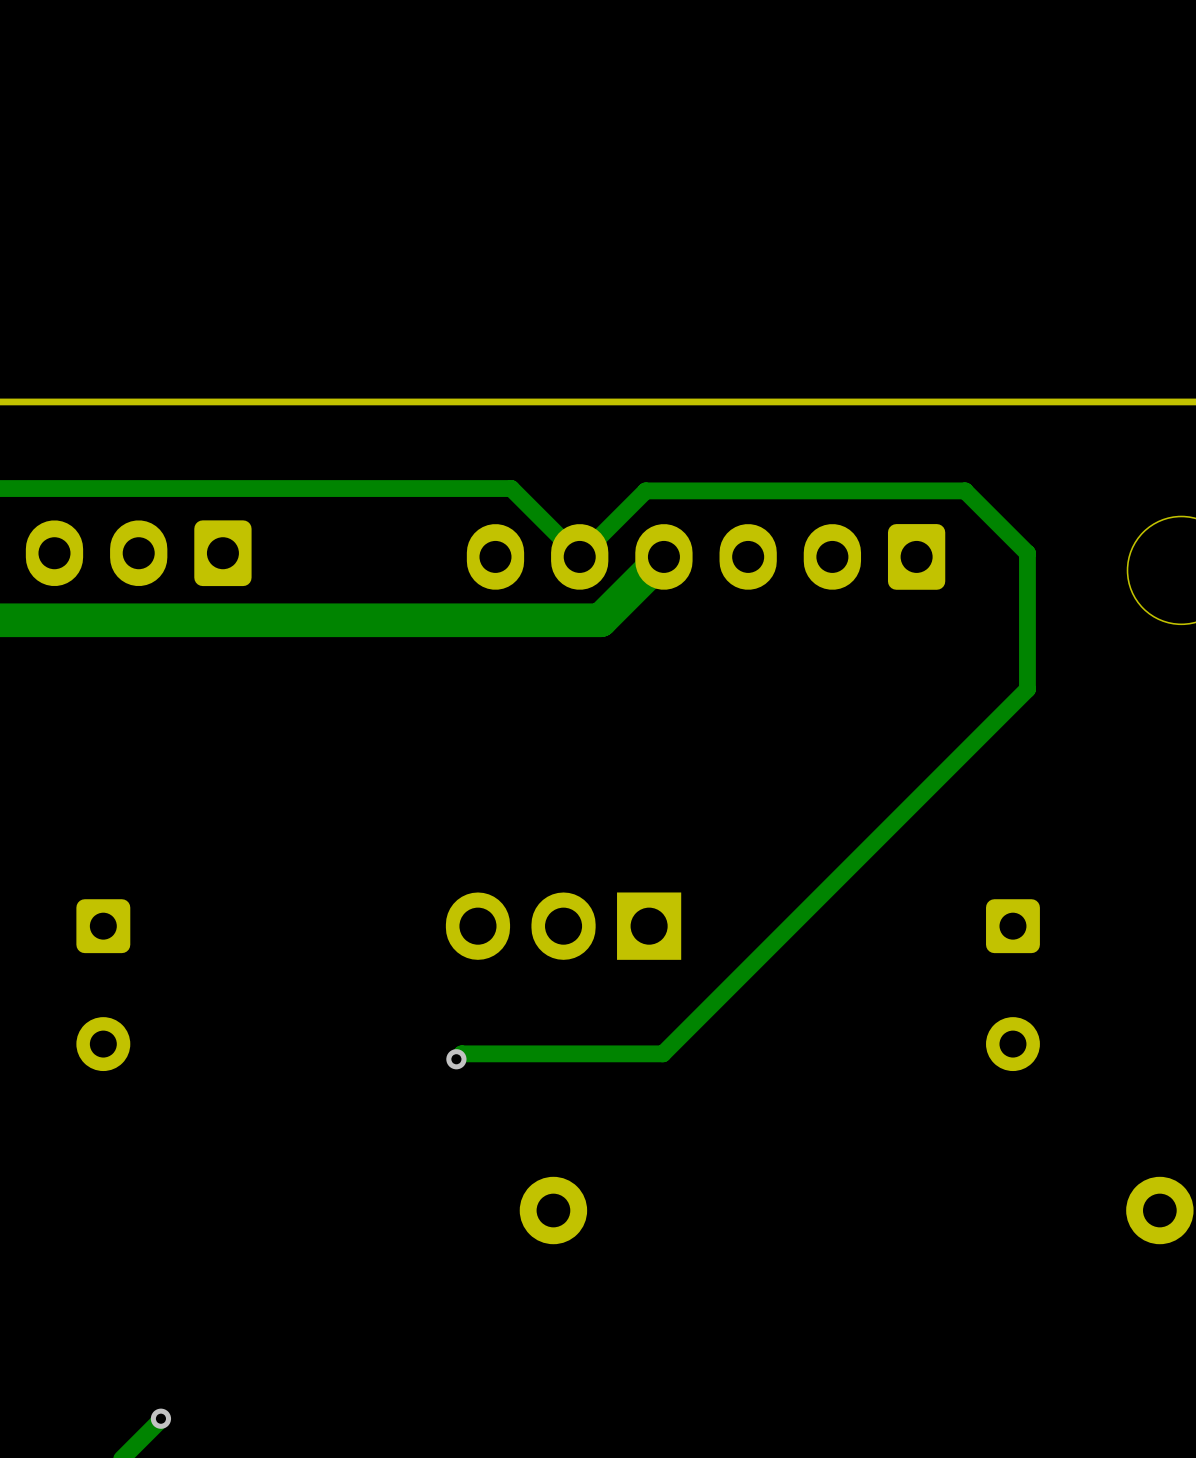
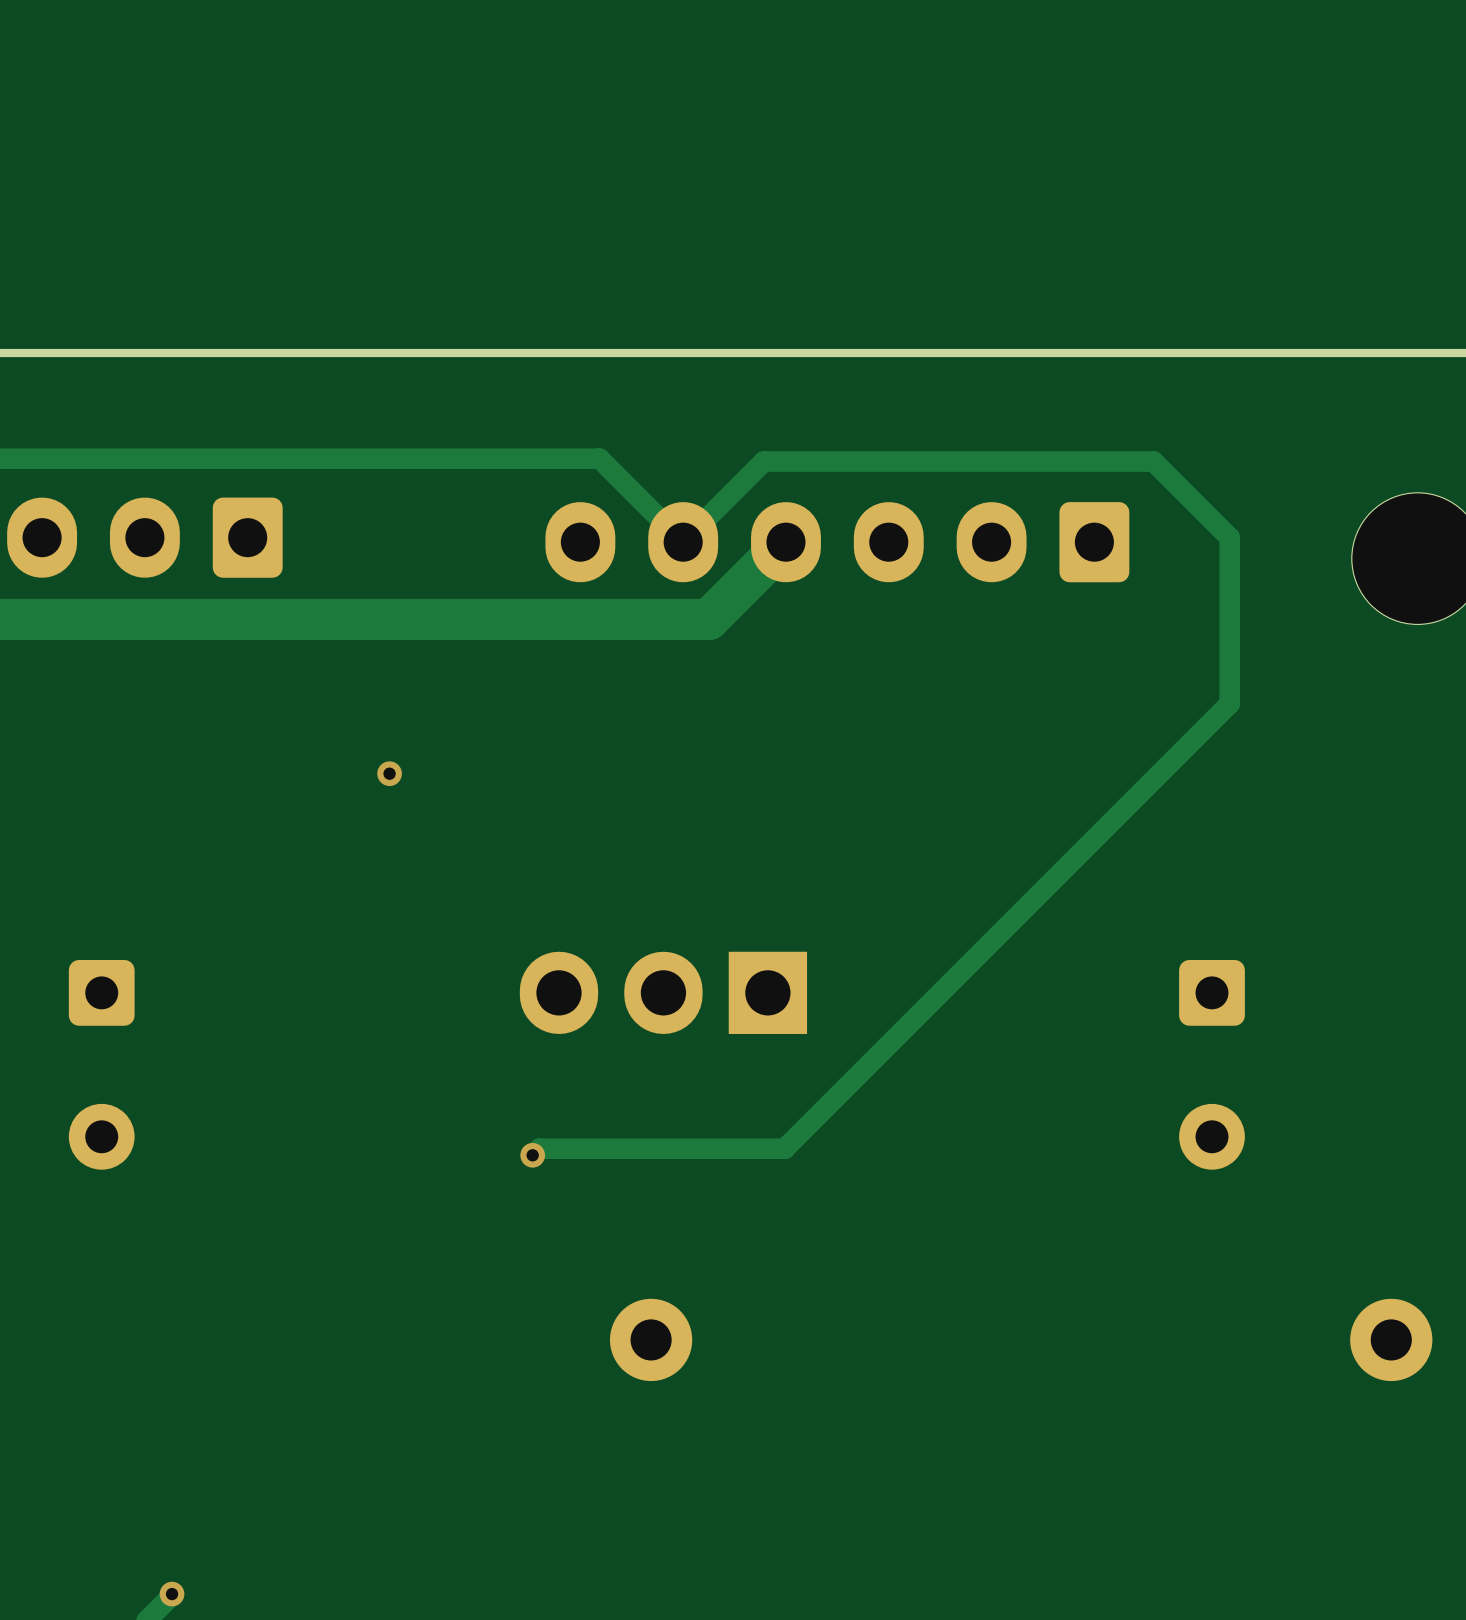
via: none -> (389, 773)

